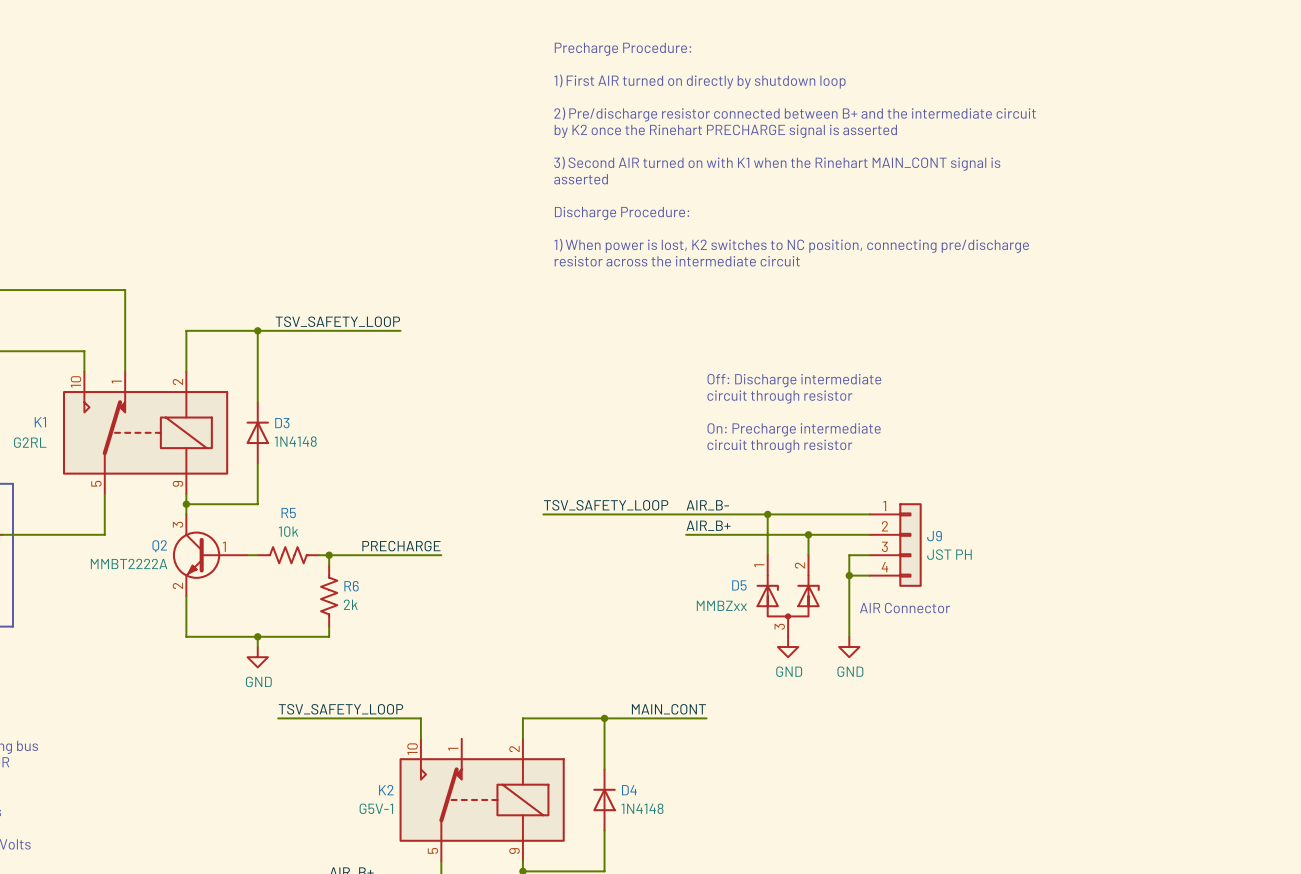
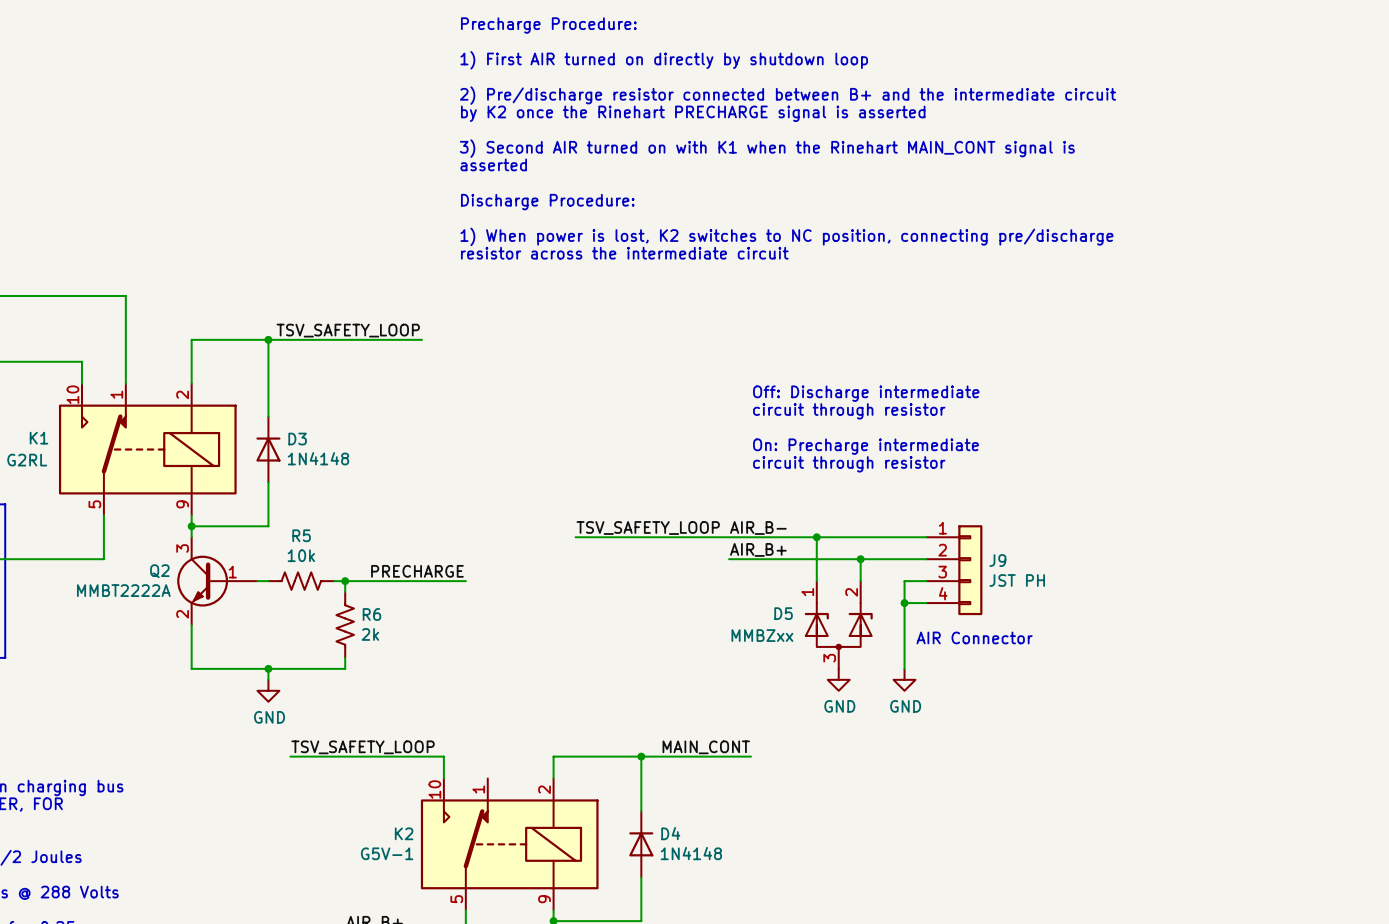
text position: Precharge Procedure: (623, 49) -> Precharge Procedure: (548, 25)
text position: 1) First AIR turned on directly by shutdown loop (699, 81) -> 1) First AIR turned on directly by shutdown loop (664, 60)
text position: 2) Pre/discharge resistor connected between B+ and the intermediate circuit (795, 114) -> 2) Pre/discharge resistor connected between B+ and the intermediate circuit (788, 95)
text position: by K2 once the Rinehart PRECHARGE signal is asserted (725, 131) -> by K2 once the Rinehart PRECHARGE signal is asserted (693, 113)
text position: 3) Second AIR turned on with K1 when the Rinehart MAIN_CONT signal is (777, 163) -> 3) Second AIR turned on with K1 when the Rinehart MAIN_CONT signal is (767, 148)
text position: asserted (581, 179) -> asserted (493, 164)
text position: Discharge Procedure: (622, 213) -> Discharge Procedure: (547, 202)
text position: 1) When power is lost, K2 switches to NC position, connecting pre/discharge (791, 245) -> 1) When power is lost, K2 switches to NC position, connecting pre/discharge (786, 236)
text position: resistor across the intermediate circuit (677, 261) -> resistor across the intermediate circuit (624, 253)

